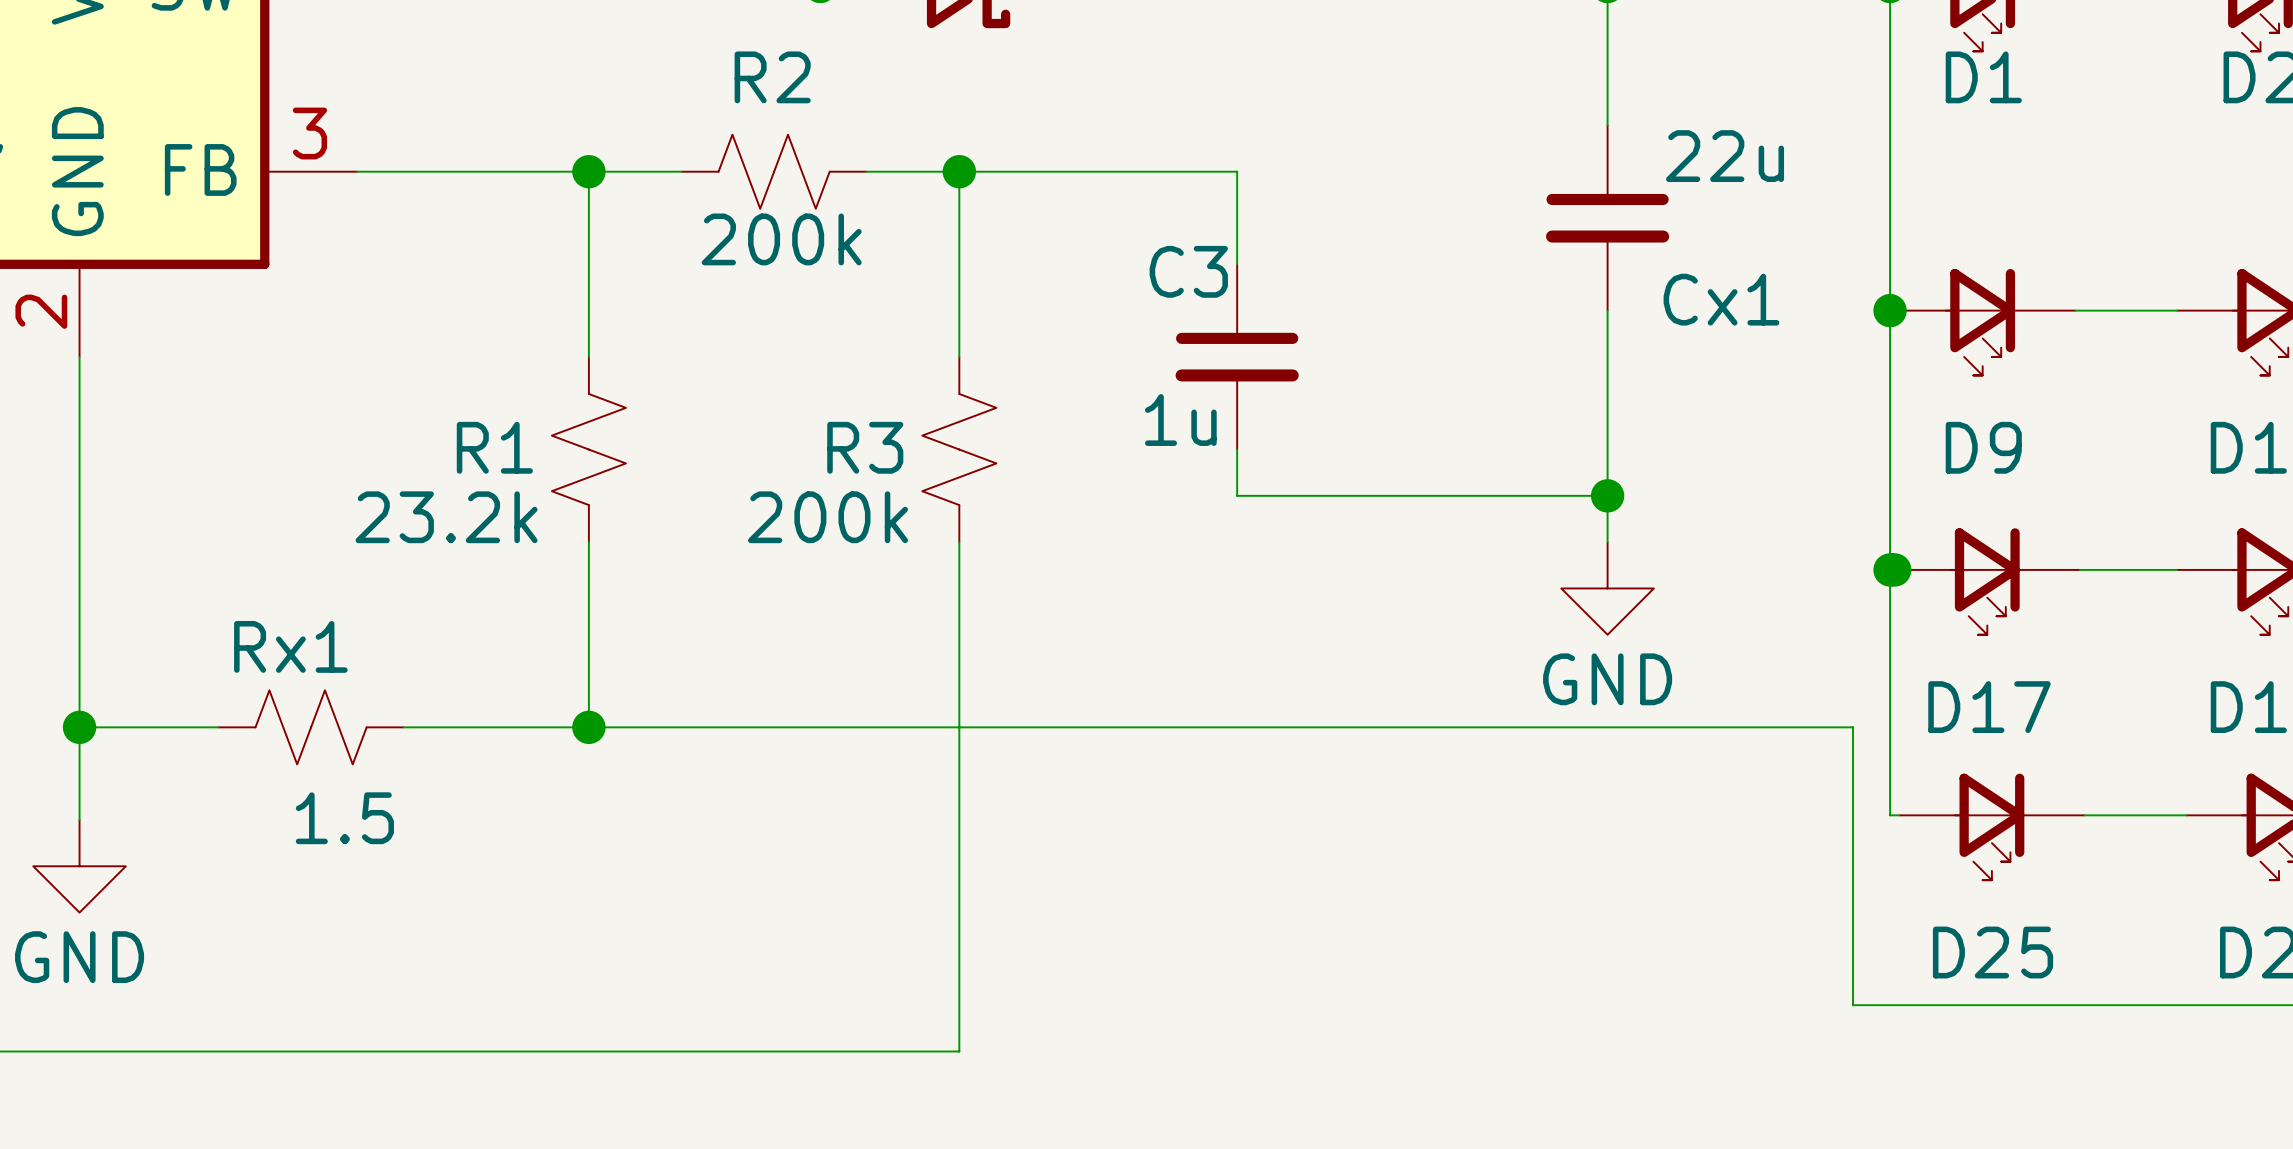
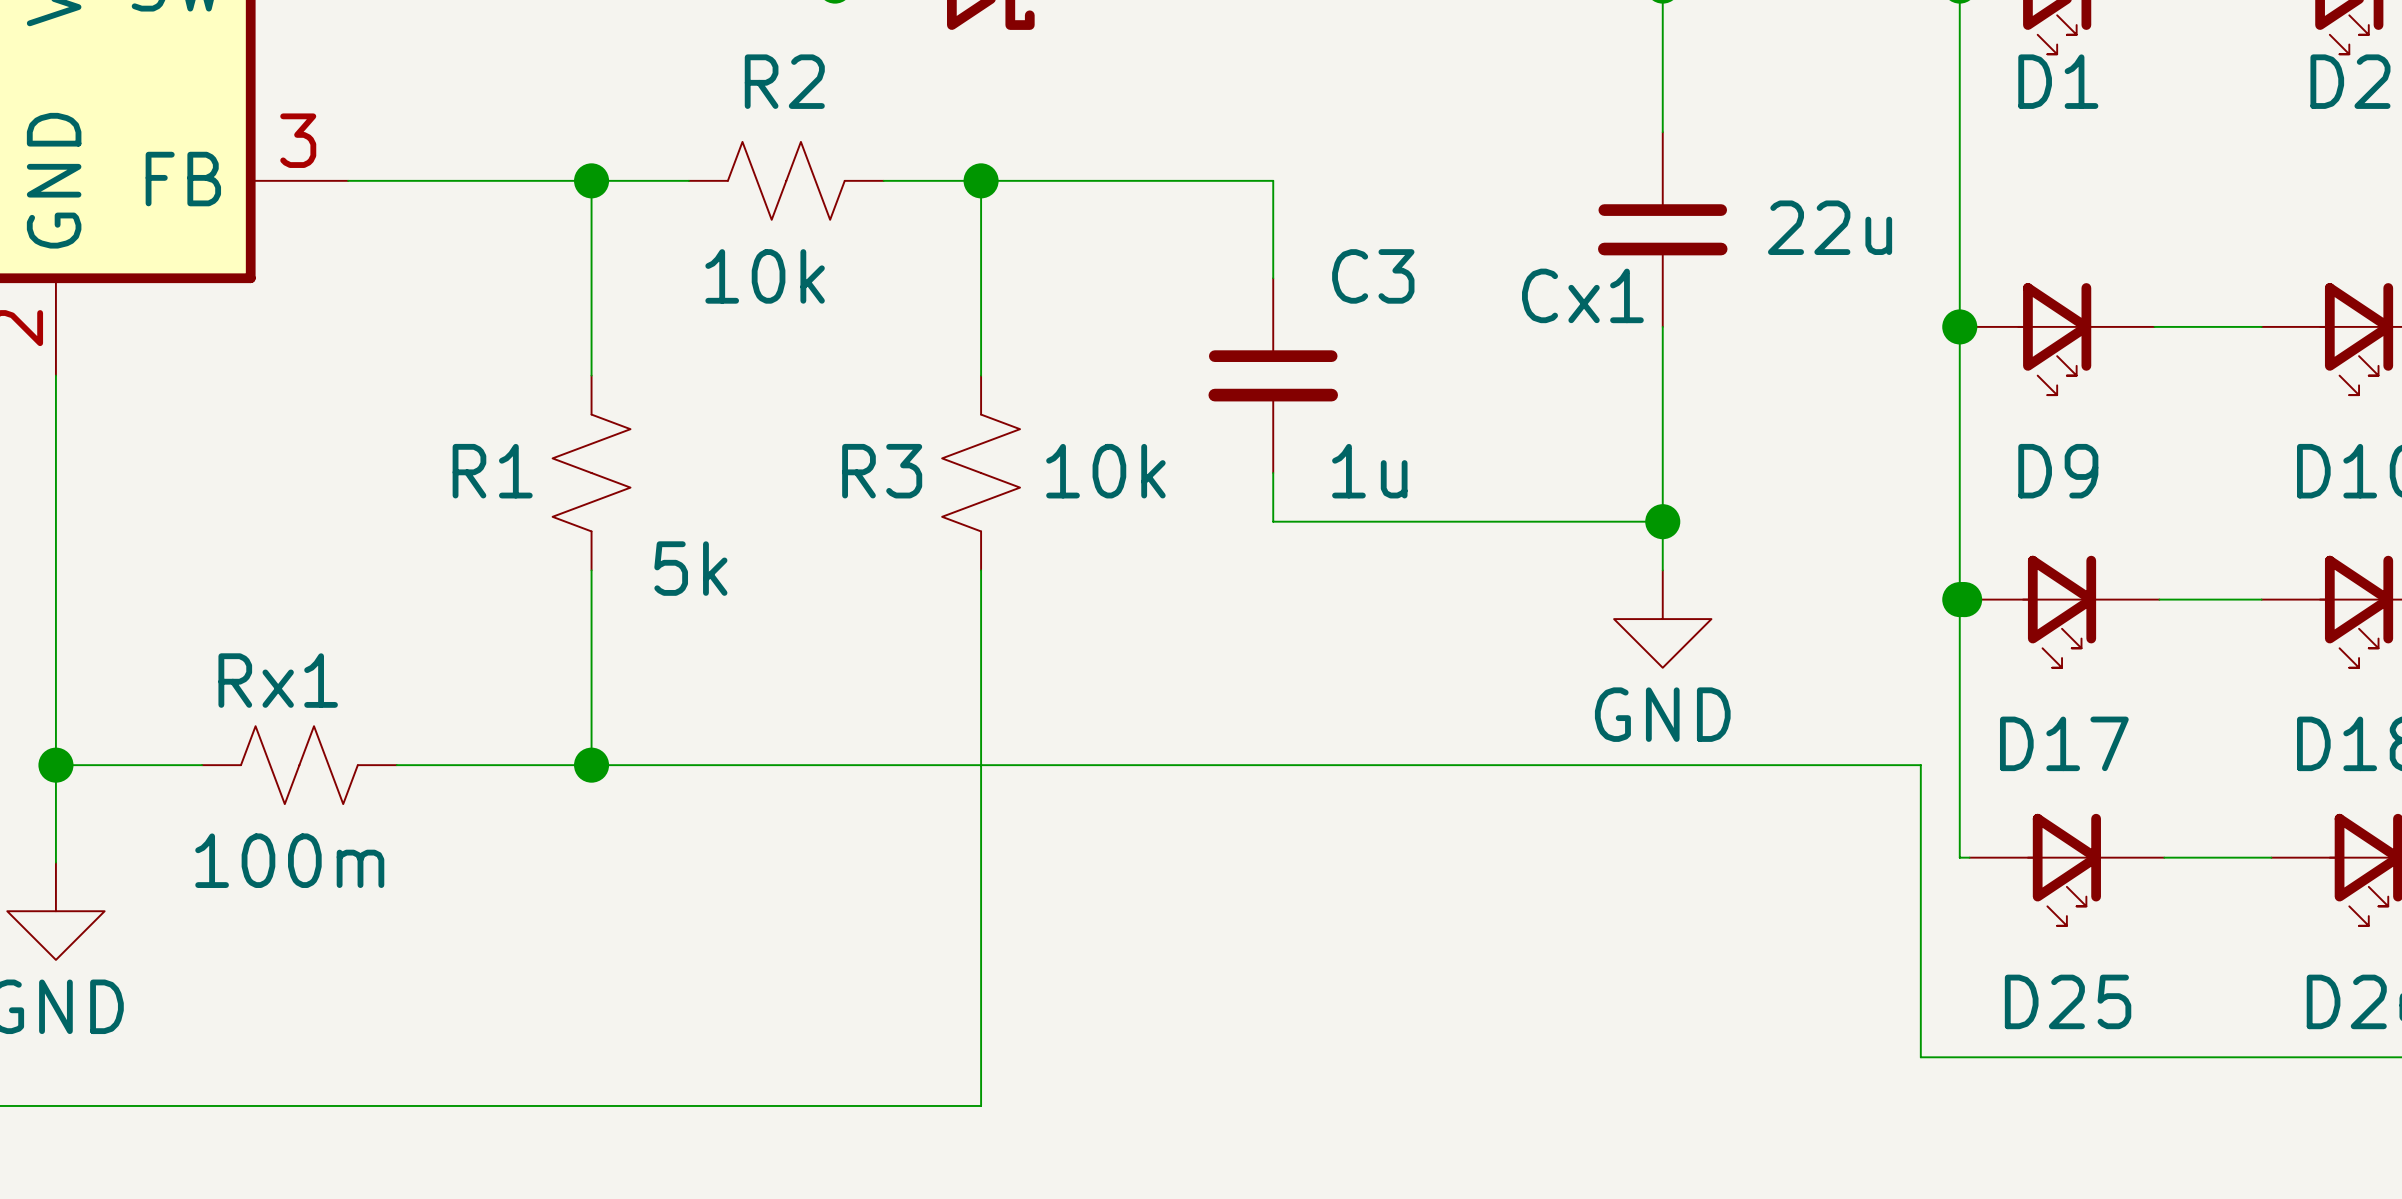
Cx1 value position: 22u (1725, 156) -> 22u (1830, 227)
R2 value: 200k (781, 239) -> 10k (765, 276)
C3 name position: C3 (1188, 271) -> C3 (1373, 276)
Cx1 name position: Cx1 (1721, 299) -> Cx1 (1582, 295)
C3 value position: 1u (1180, 420) -> 1u (1369, 471)
R1 value: 23.2k (446, 517) -> 5k (690, 568)
R3 value: 200k (828, 517) -> 10k (1105, 471)
Rx1 value: 1.5 (344, 818) -> 100m (289, 860)

